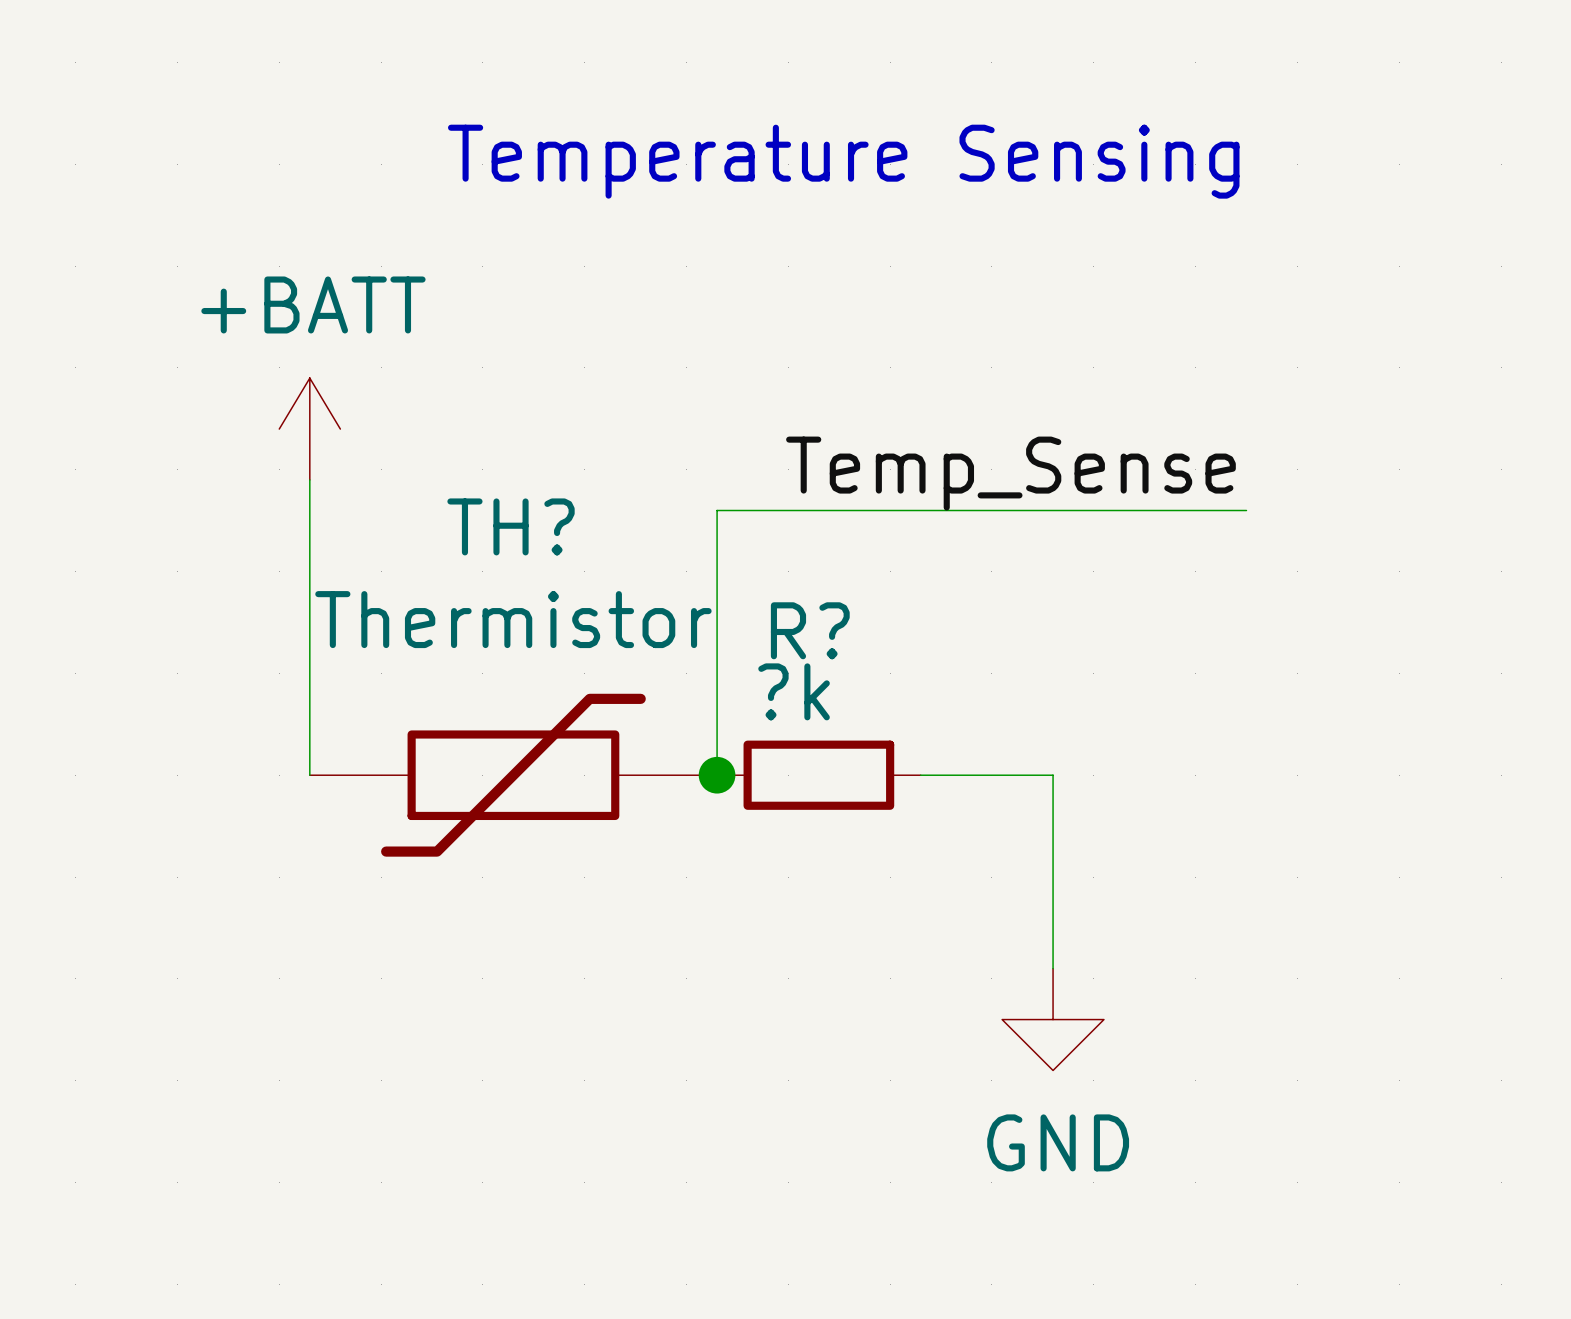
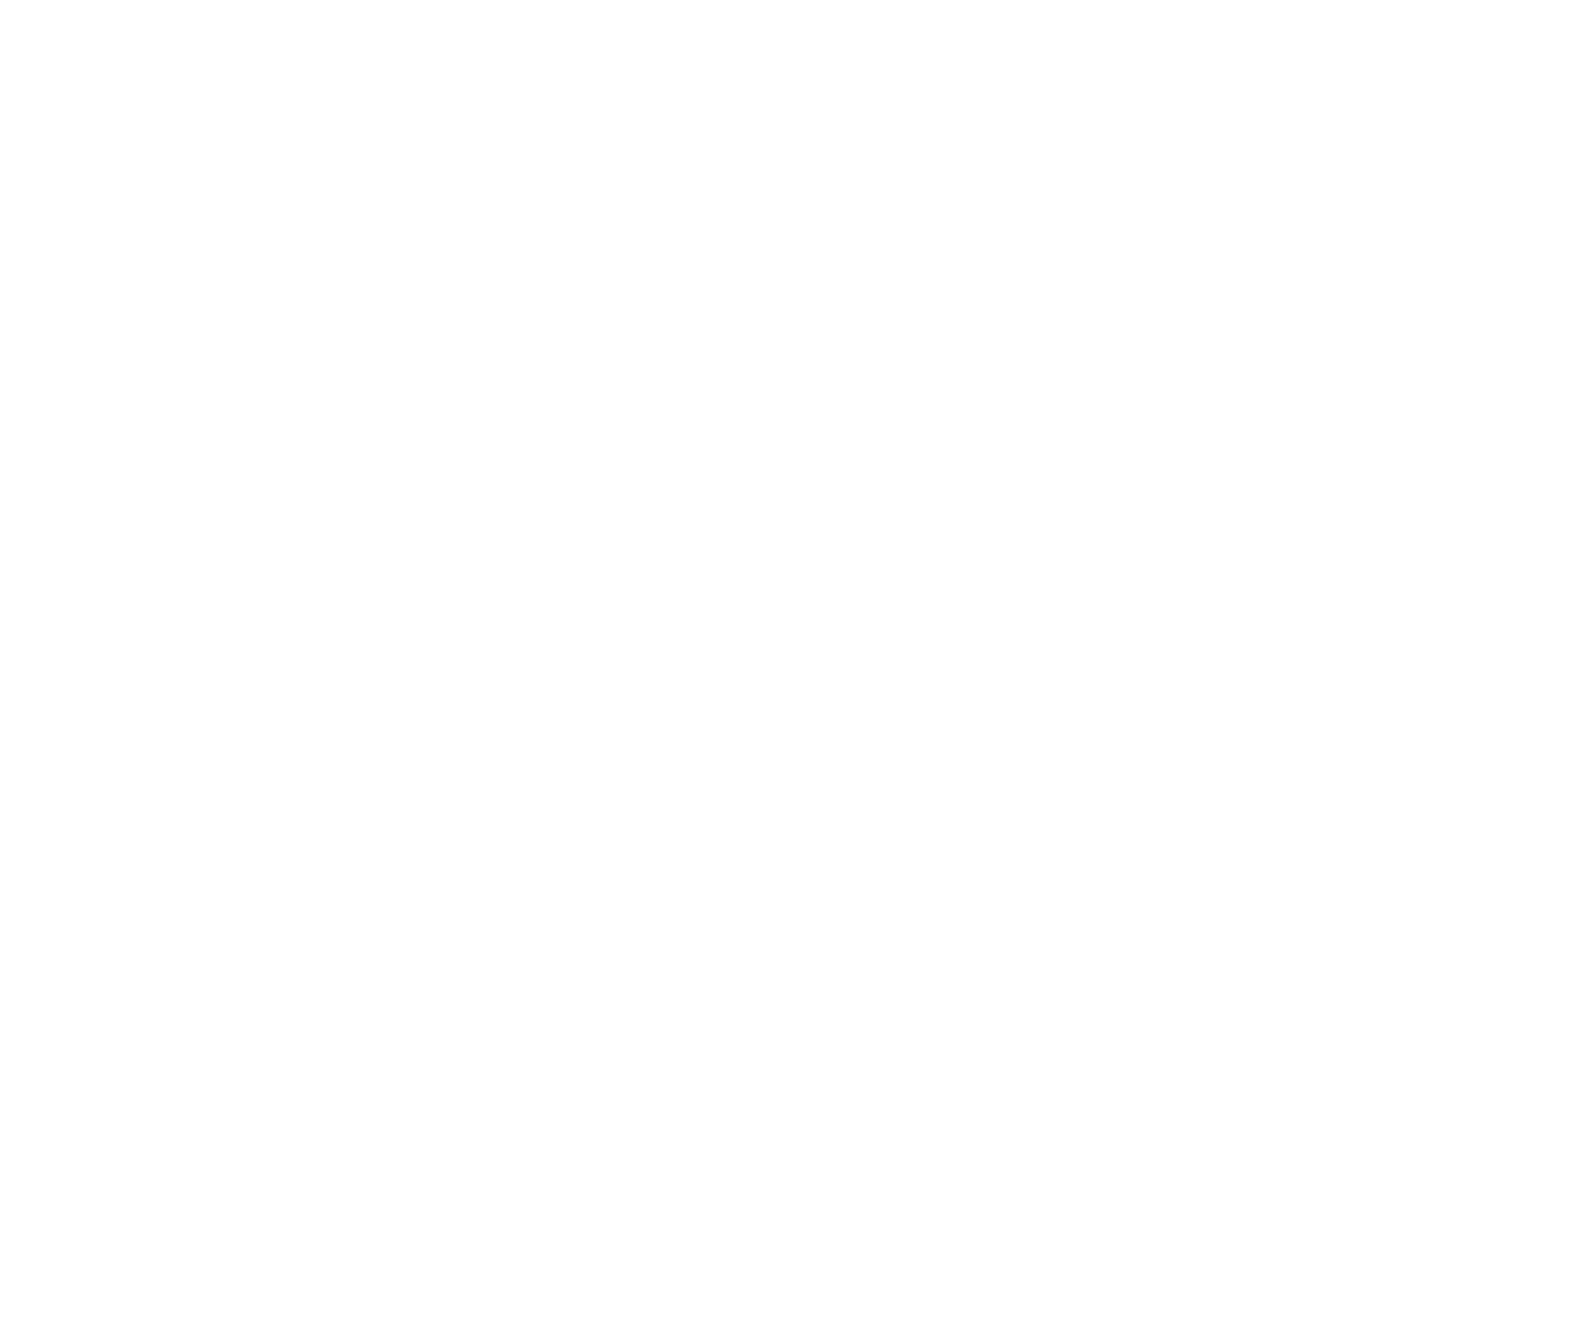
text: Temperature Sensing (843, 161) -> none
power symbol: +BATT (309, 429) -> none
label: Temp_Sense (1010, 473) -> none
wire: (309, 479) (309, 775) -> none
wire: (1246, 510) (717, 510) (717, 775) -> none
TH?: Thermistor (513, 775) -> none
junction: (717, 775) -> none
R?: ?k (818, 775) -> none
wire: (920, 775) (1053, 775) (1053, 968) -> none
power symbol: GND (1053, 1019) -> none

